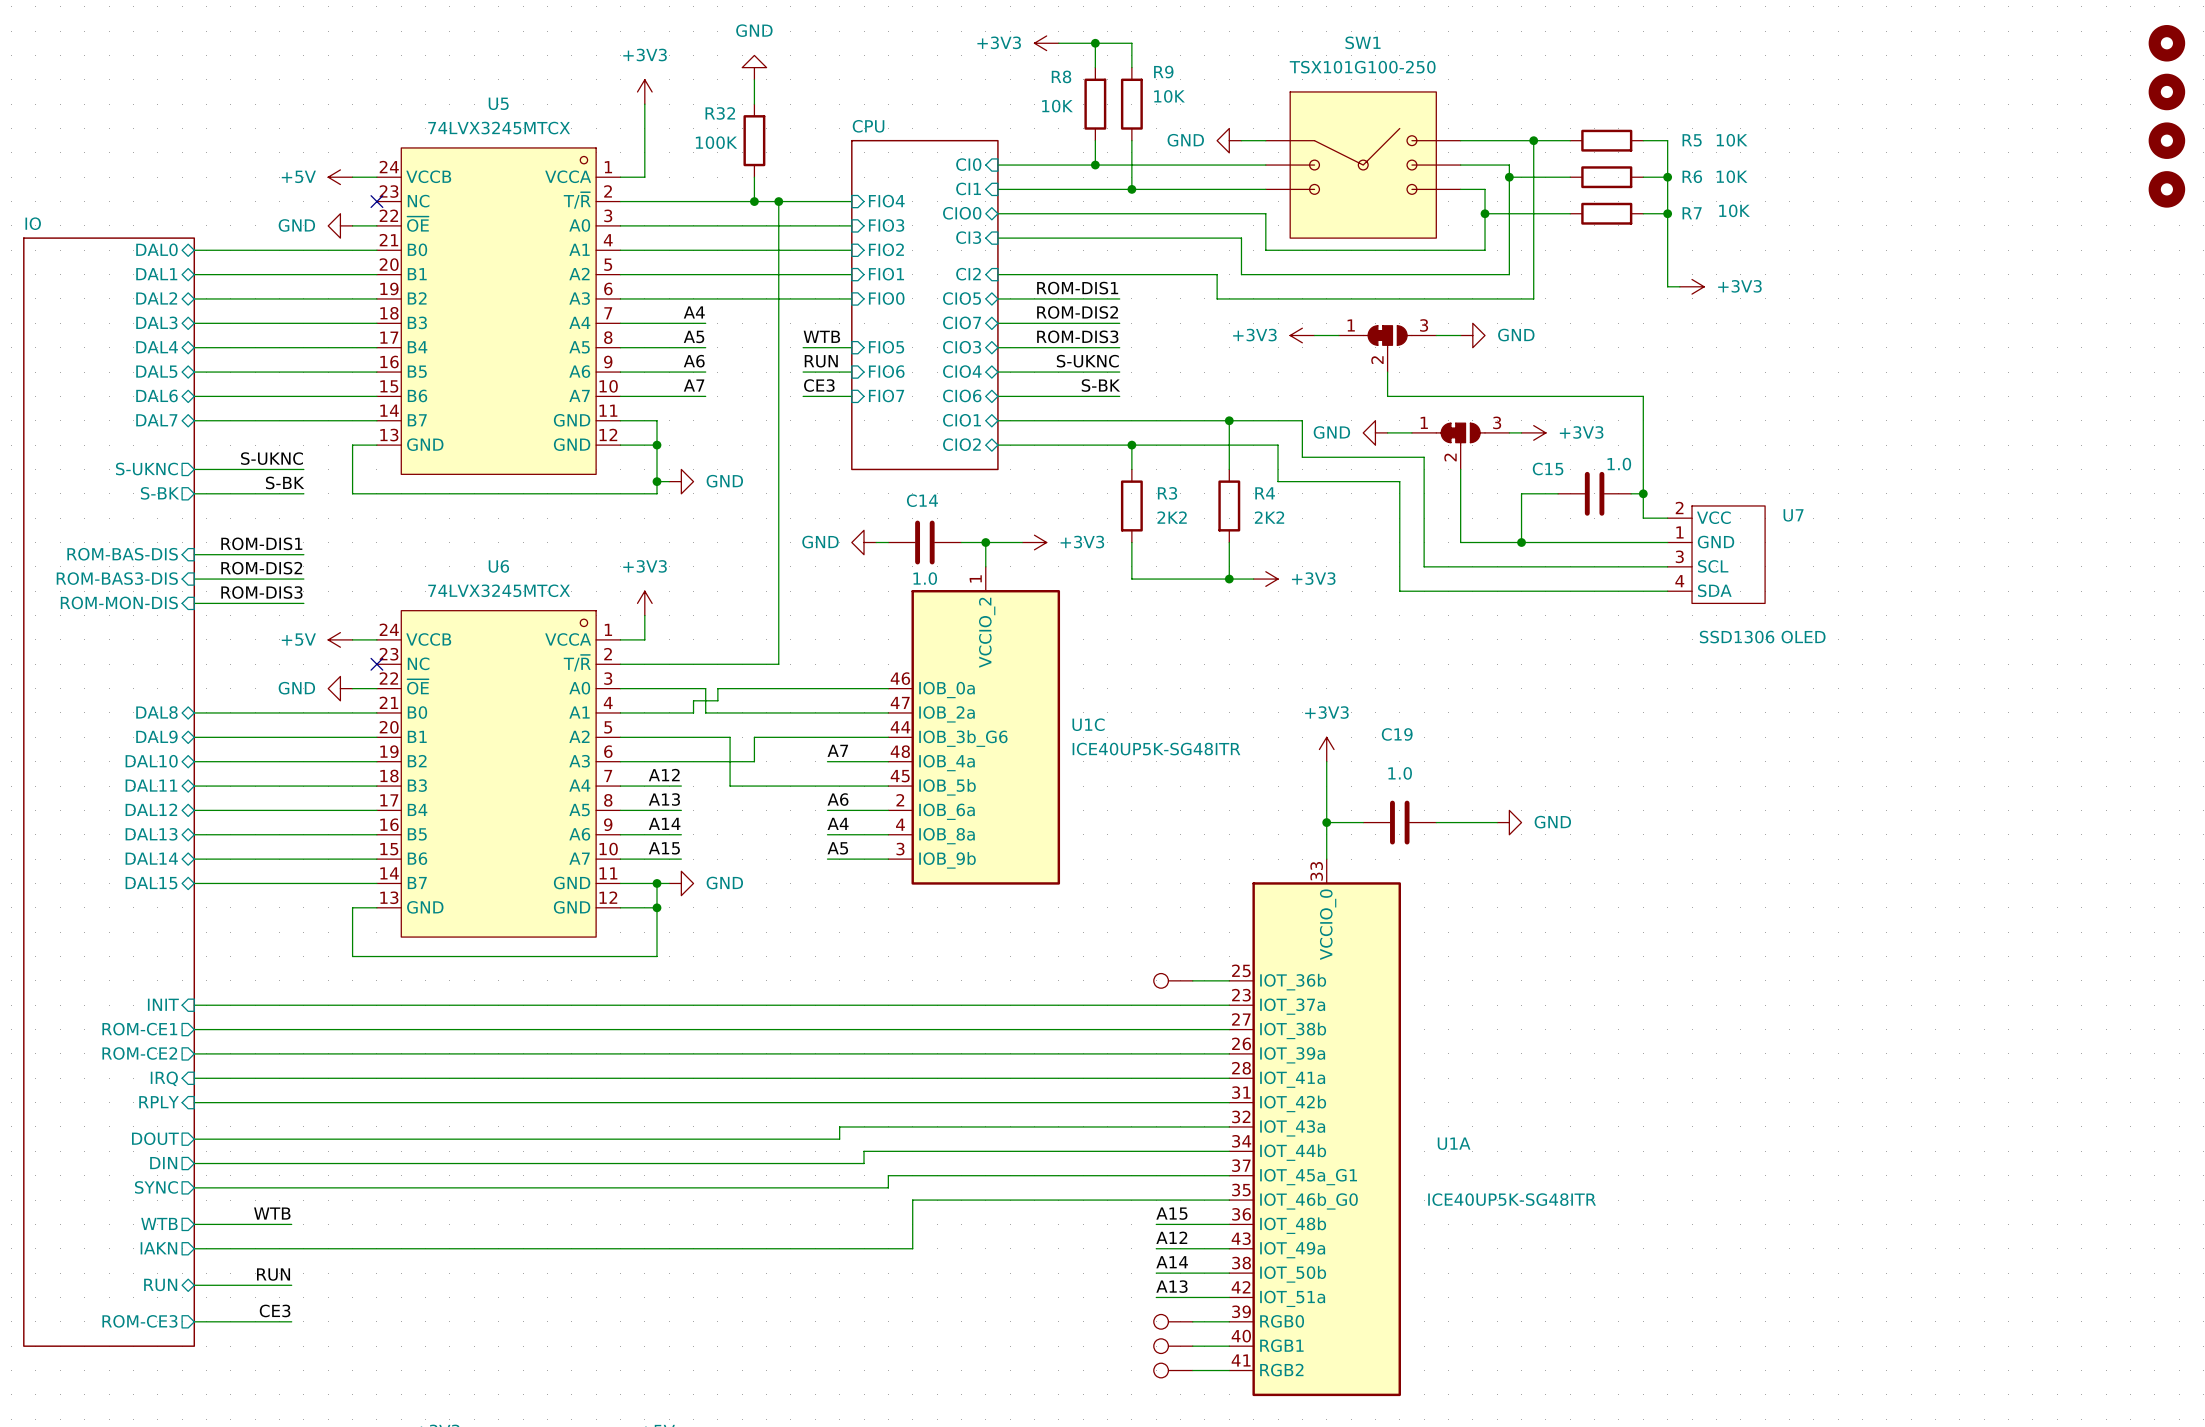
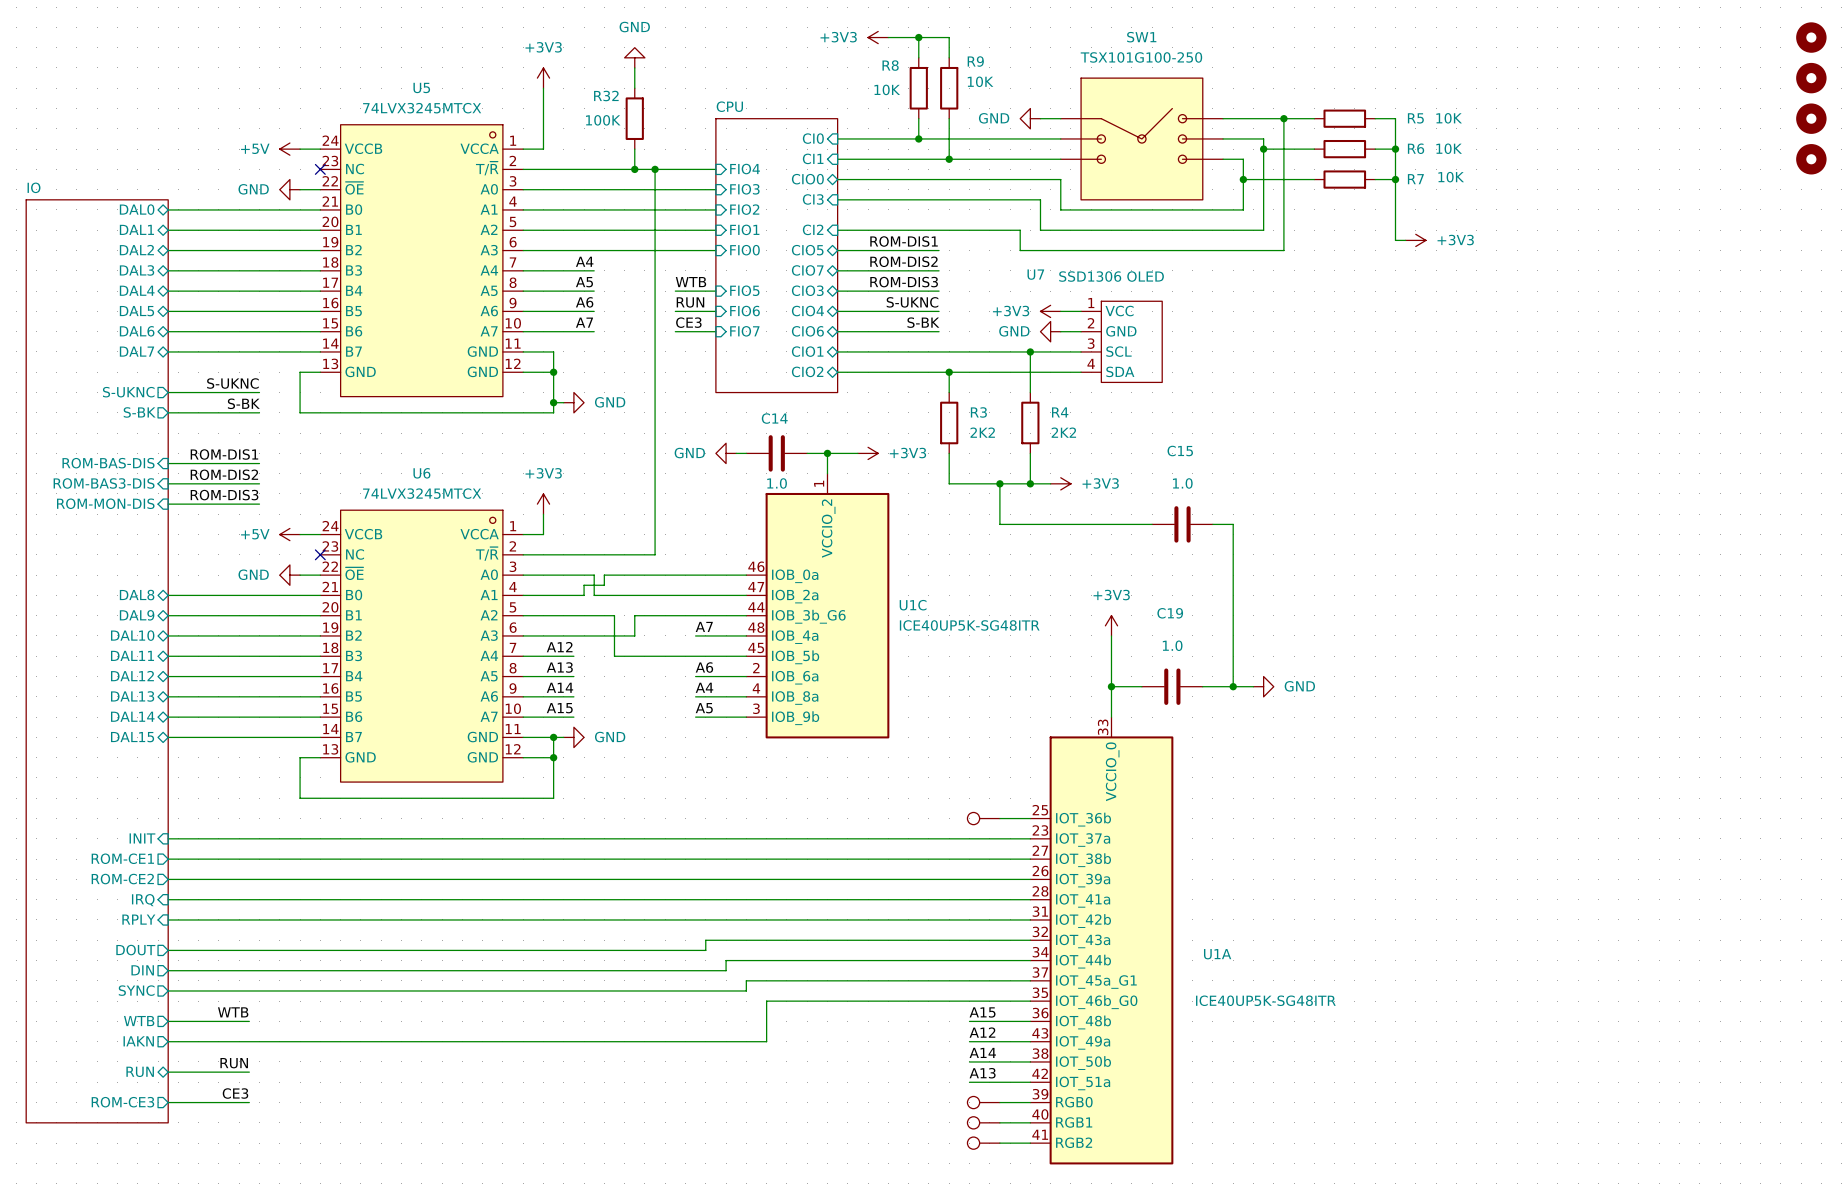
power symbol position: +3V3 (1302, 335) -> +3V3 (1050, 311)
wire: (1314, 335) (1338, 335) -> (1060, 311) (1081, 311)
wire: (1436, 335) (1460, 335) -> none
power symbol: GND (1472, 335) -> none
part: (1387, 348) -> none
wire: (1387, 372) (1387, 396) (1643, 396) (1643, 518) (1667, 518) -> none
power symbol: none -> GND (1050, 331)
wire: (1290, 420) (1302, 420) (1302, 457) (1424, 457) (1424, 566) (1667, 566) -> none
power symbol: GND (1375, 432) -> none
wire: (1387, 432) (1411, 432) -> (1060, 331) (1081, 331)
wire: (1509, 432) (1521, 432) -> none
power symbol: +3V3 (1533, 432) -> none
wire: (1278, 445) (1278, 481) (1399, 481) (1399, 591) (1667, 591) -> (1070, 372) (1081, 372)
part: (1460, 446) -> none
C15 value position: 1.0 (1619, 464) -> 1.0 (1182, 483)
wire: (1460, 469) (1460, 542) (1667, 542) -> none
C15 name position: C15 (1548, 469) -> C15 (1180, 451)
wire: (1558, 493) (1521, 493) (1521, 542) -> none
C15 position: (1594, 493) -> (1182, 524)
wire: (1631, 493) (1643, 493) -> none
junction: (1643, 493) -> none
U7 pin number: 2 (1679, 508) -> 1 (1091, 303)
U7 name position: U7 (1793, 515) -> U7 (1035, 274)
U7 pin number: 1 (1679, 532) -> 2 (1091, 323)
junction: (1521, 542) -> none
U7 position: (1716, 554) -> (1121, 341)
wire: none -> (999, 483) (999, 524) (1152, 524)
junction: none -> (999, 483)
wire: none -> (1212, 524) (1233, 524) (1233, 686)
U7 value position: SSD1306 OLED (1762, 637) -> SSD1306 OLED (1111, 276)
junction: none -> (1233, 686)

